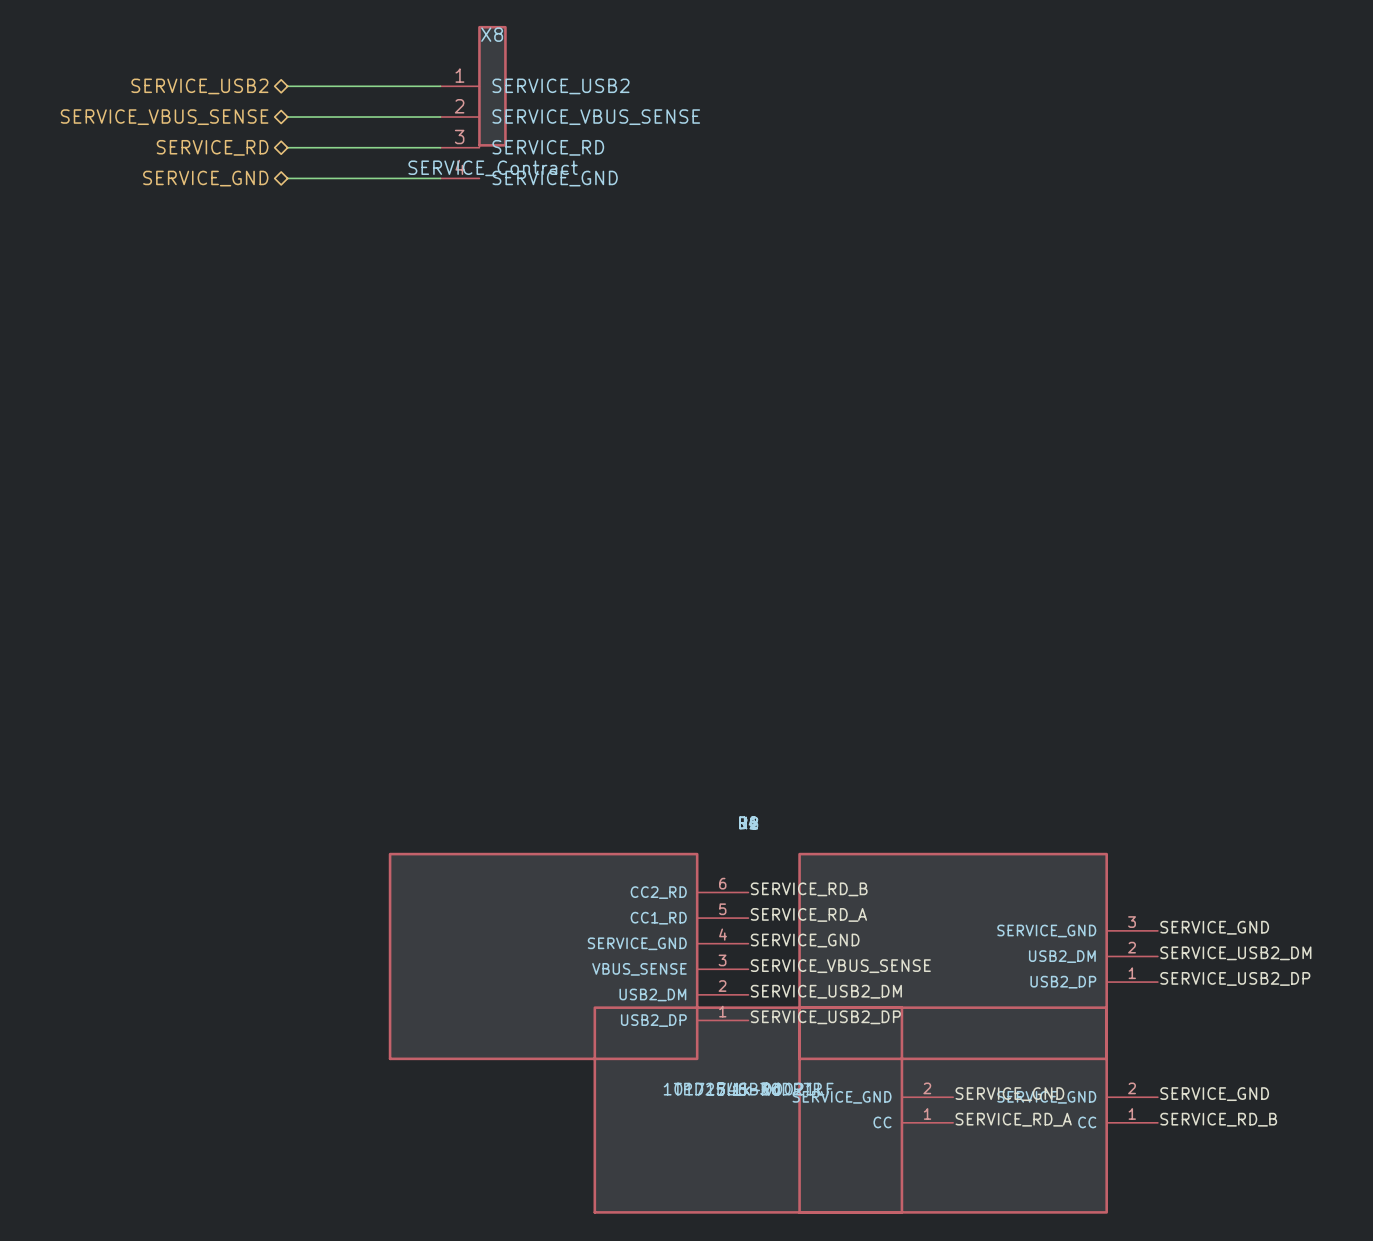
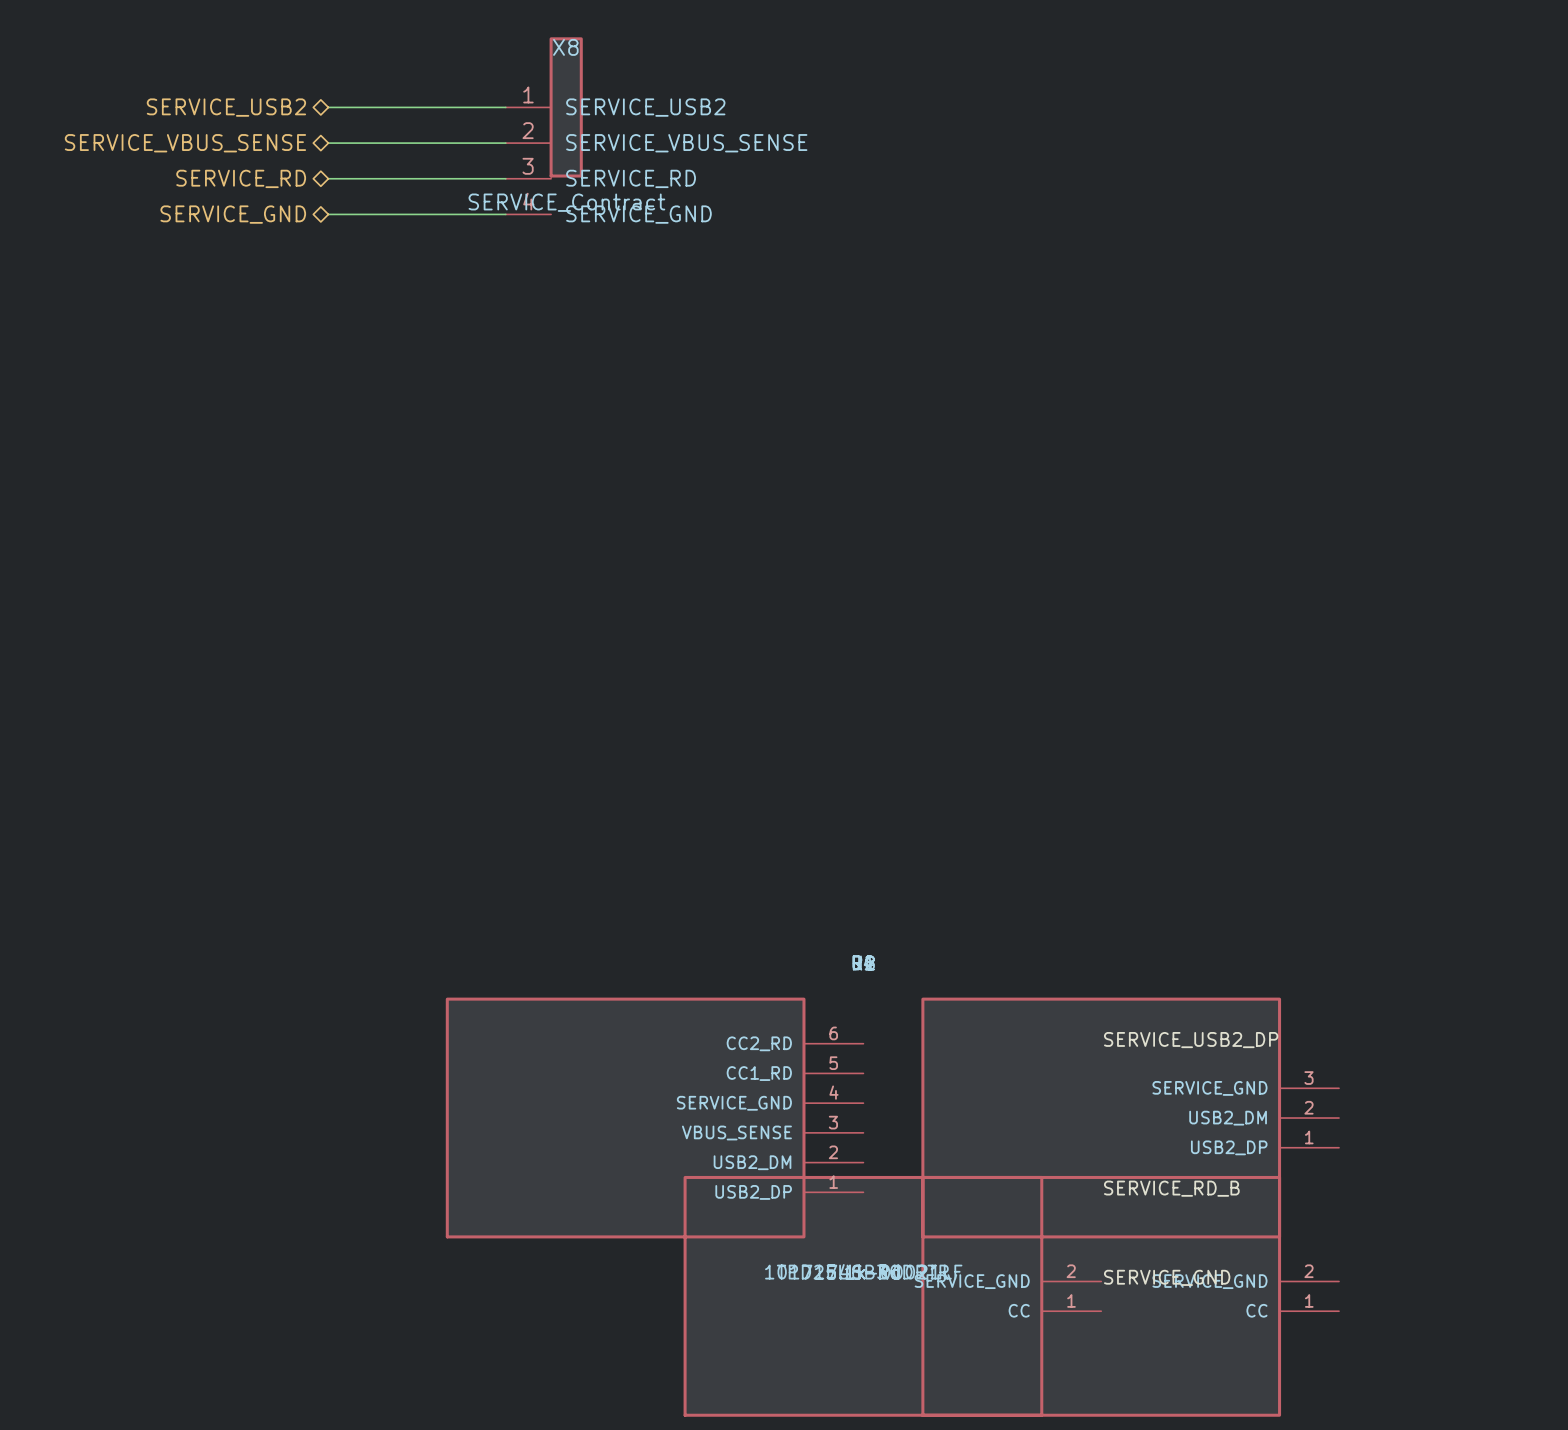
label: SERVICE_RD_B (809, 889) -> none
label: none -> SERVICE_USB2_DP (1191, 1040)
label: SERVICE_RD_A (808, 914) -> none
label: SERVICE_GND (1214, 927) -> none
label: SERVICE_GND (805, 940) -> none
label: SERVICE_USB2_DM (1235, 953) -> none
label: SERVICE_VBUS_SENSE (840, 966) -> none
label: SERVICE_USB2_DP (1235, 978) -> none
label: SERVICE_USB2_DM (826, 991) -> none
label: SERVICE_USB2_DP (825, 1017) -> none
label: none -> SERVICE_RD_B (1171, 1188)
label: SERVICE_GND (1214, 1094) -> none
label: SERVICE_RD_A (1013, 1119) -> none
label: SERVICE_RD_B (1218, 1119) -> none

